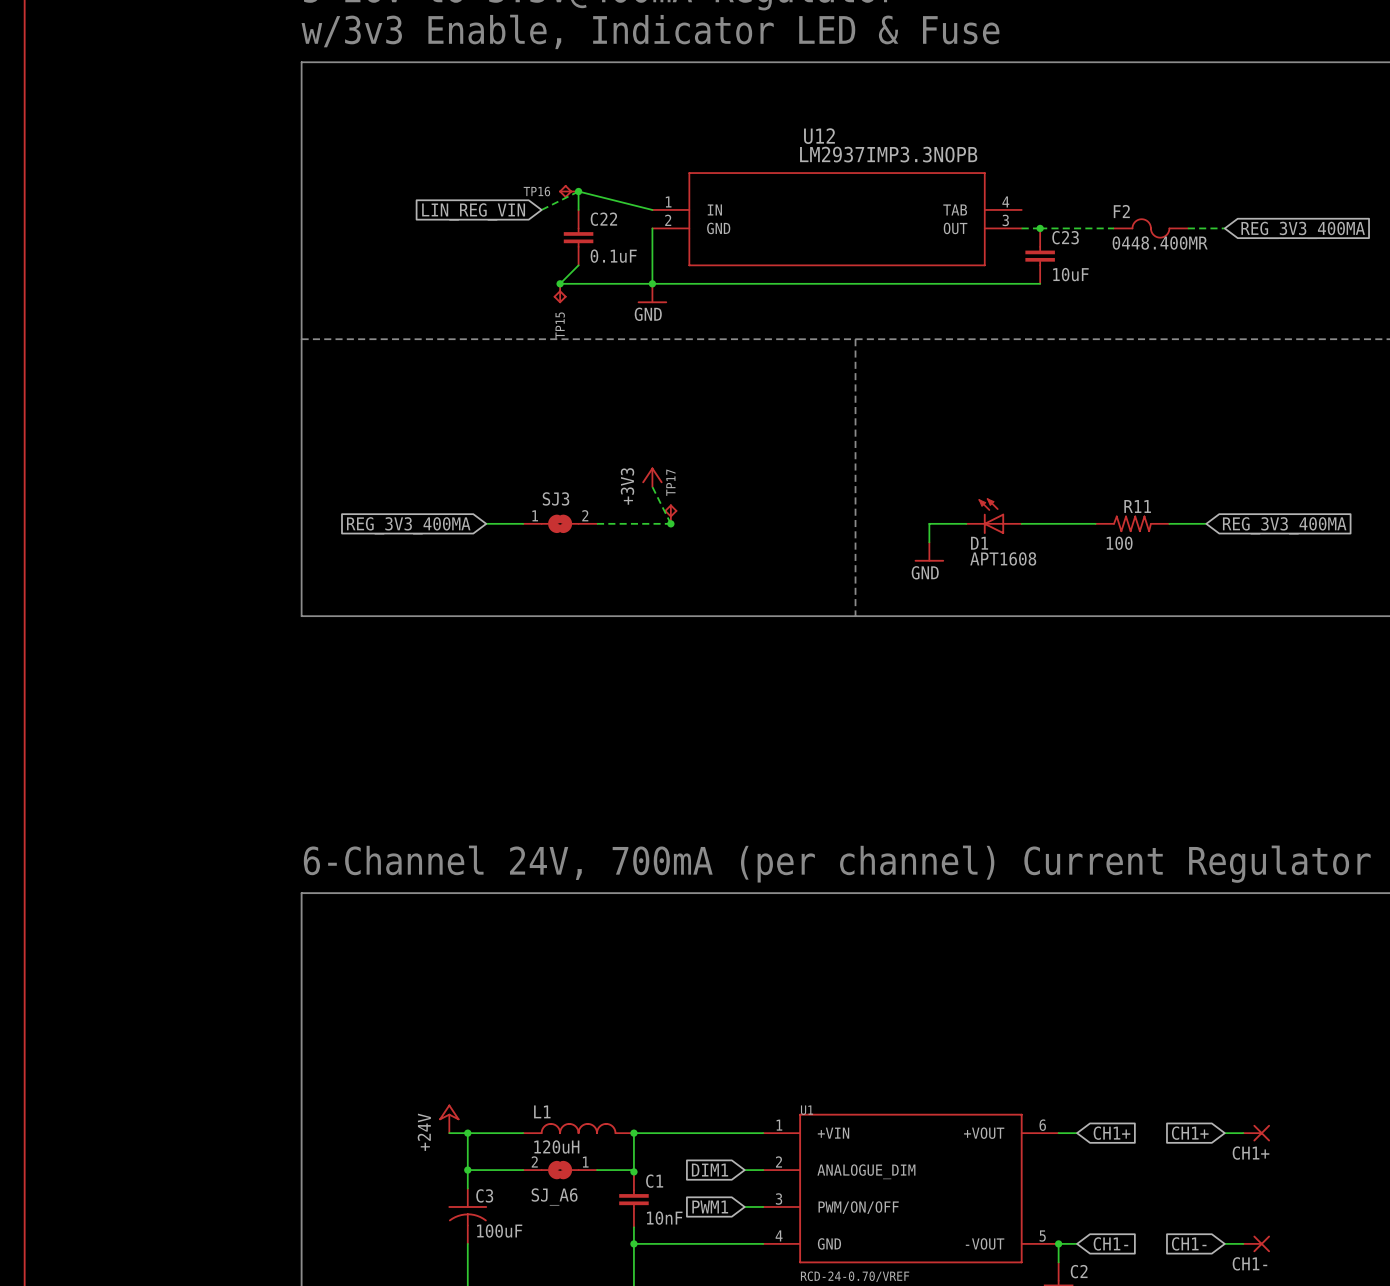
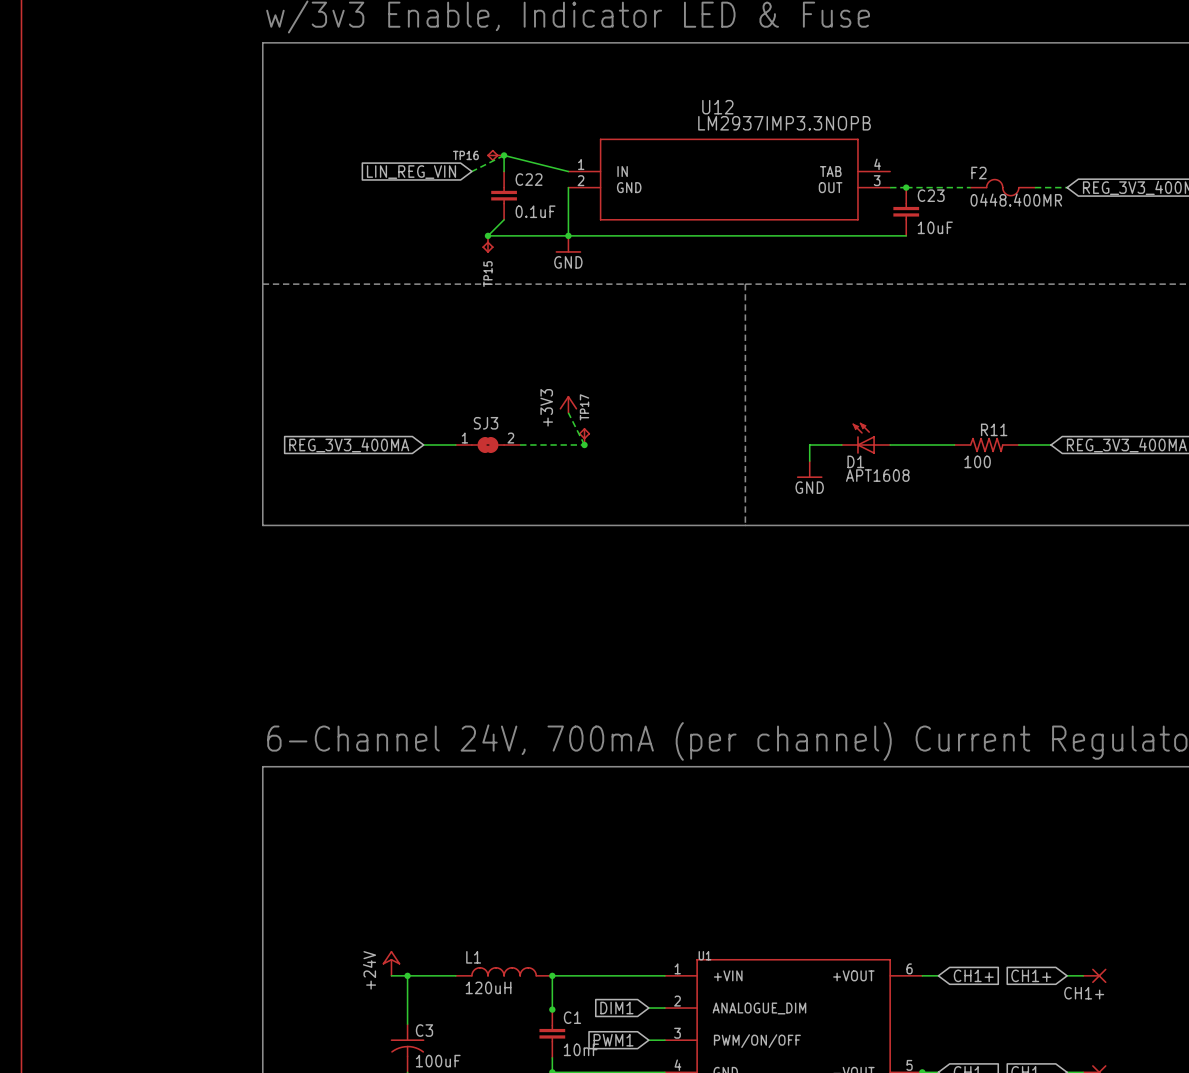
wire: (467, 1170) (523, 1170) -> none
junction: (467, 1170) -> none
SJ_A6: (560, 1170) -> none
wire: (597, 1170) (633, 1170) -> none

